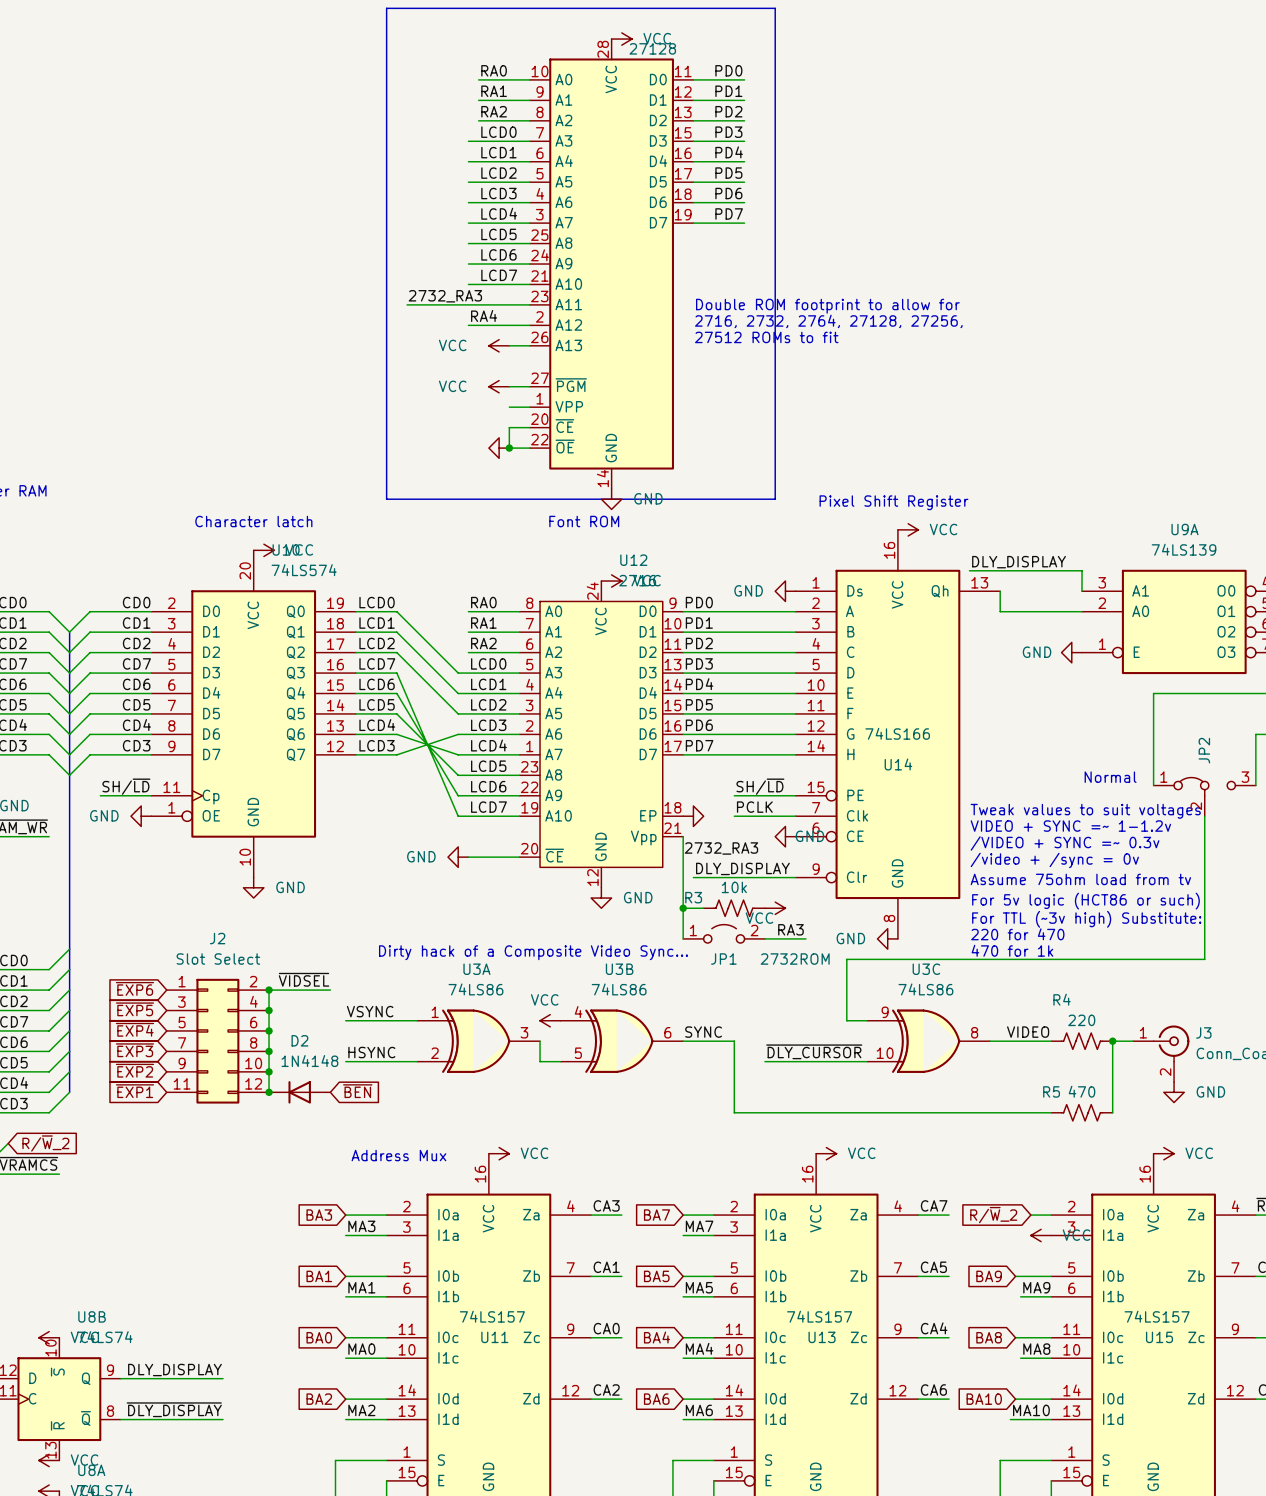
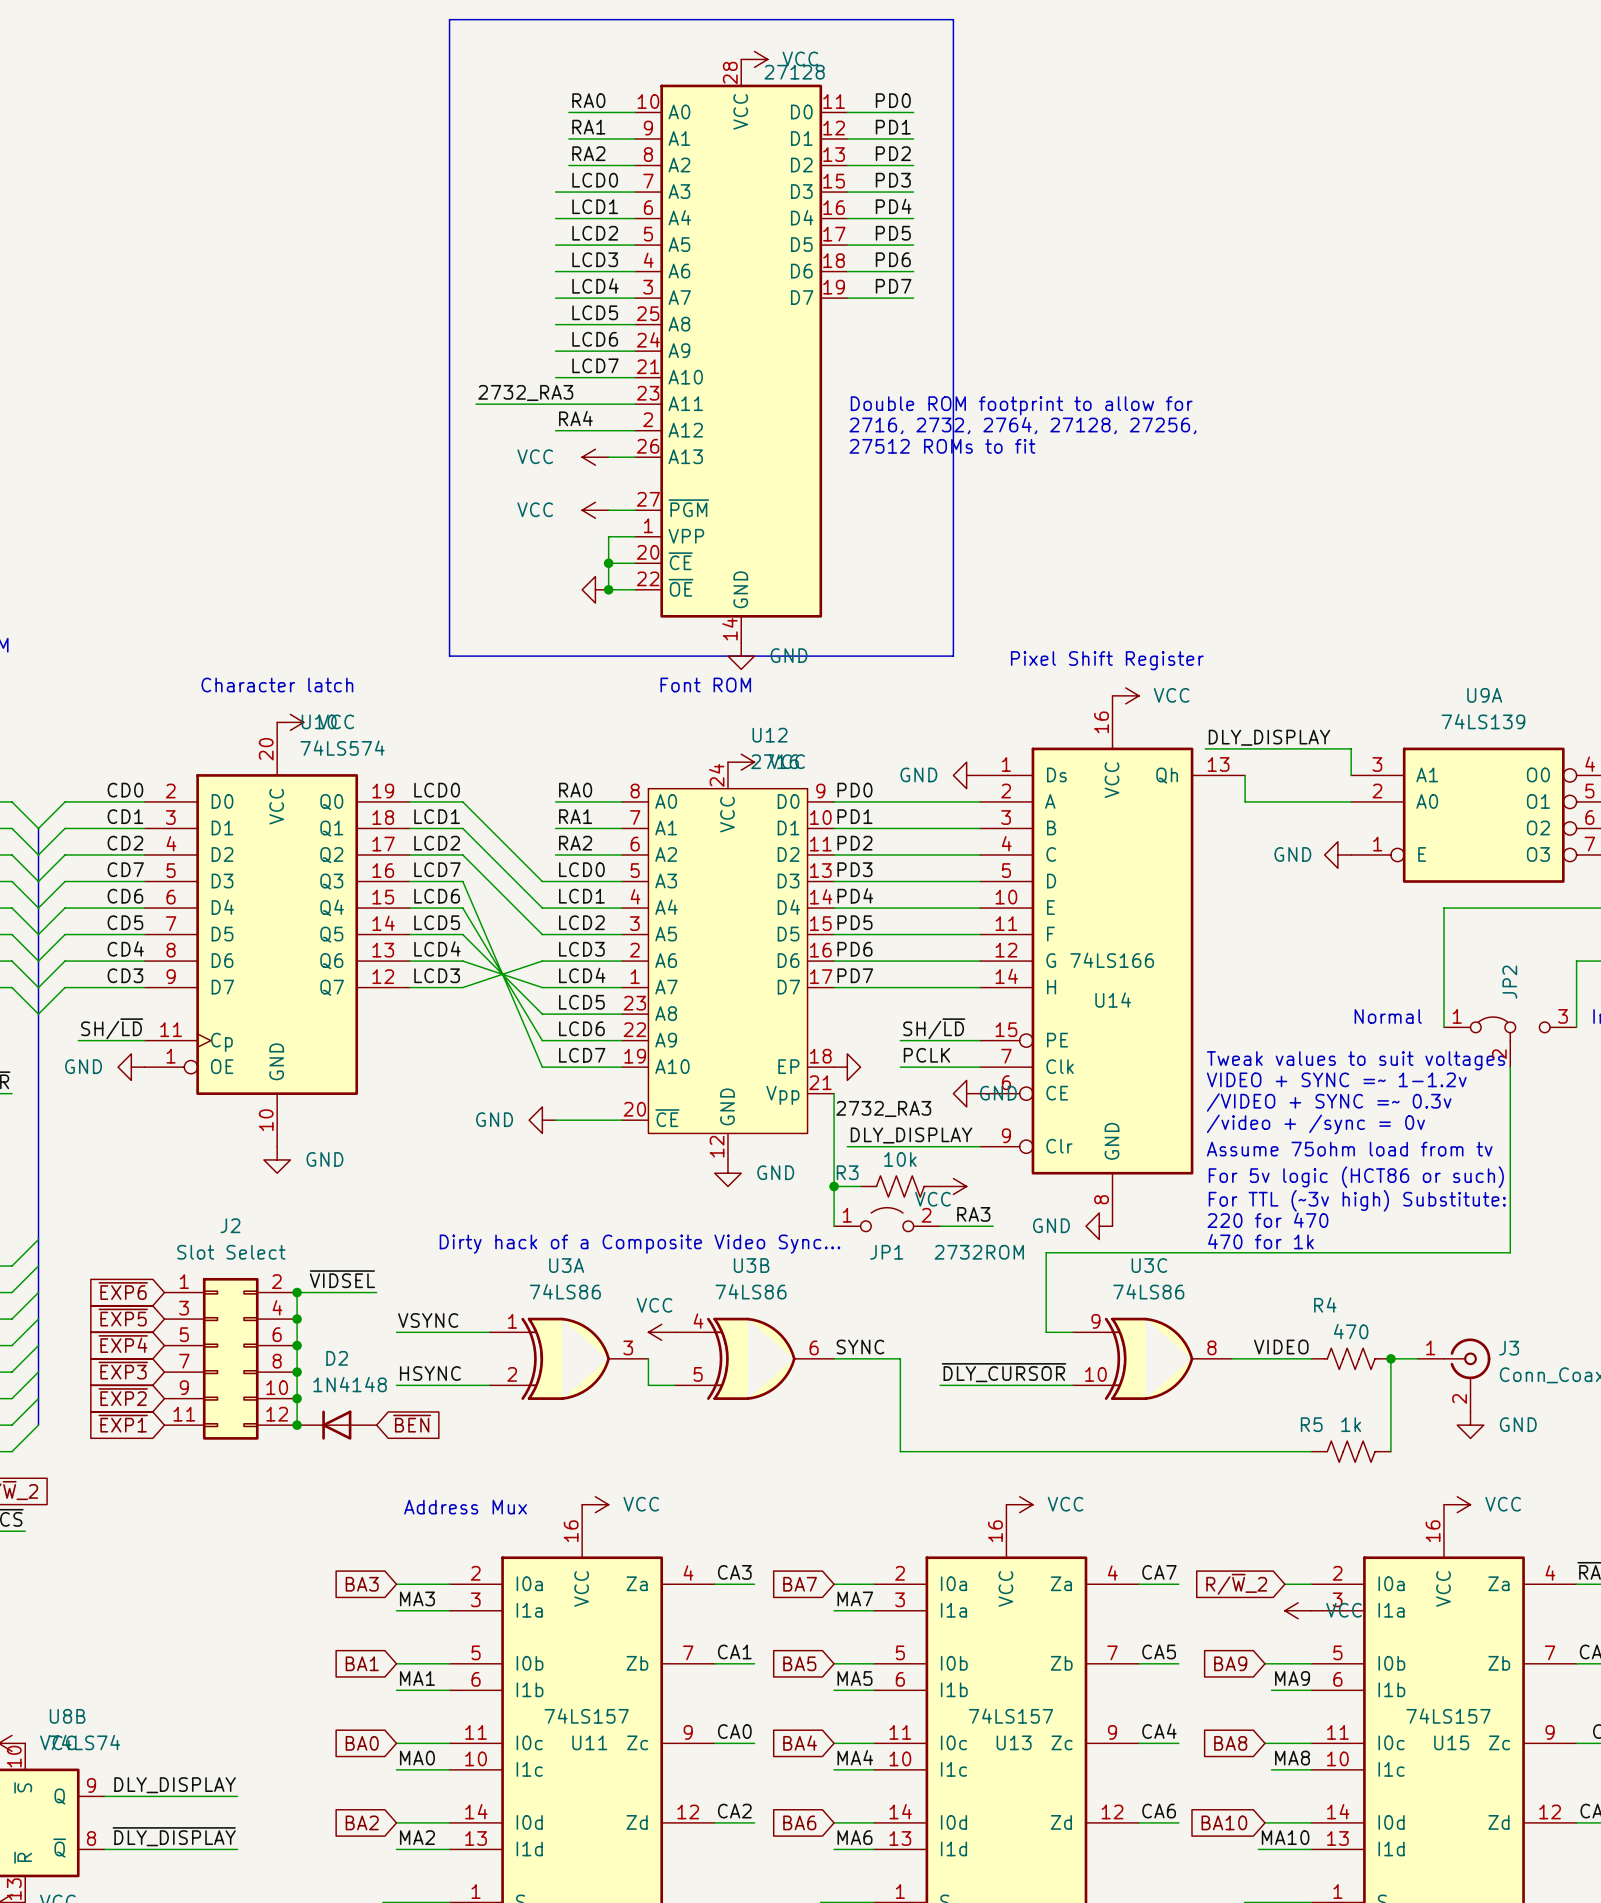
wire: none -> (608, 536) (608, 563)
junction: none -> (608, 563)
R4 value: 220 (1081, 1020) -> 470 (1351, 1331)
R5 value: 470 (1082, 1091) -> 1k (1351, 1424)

